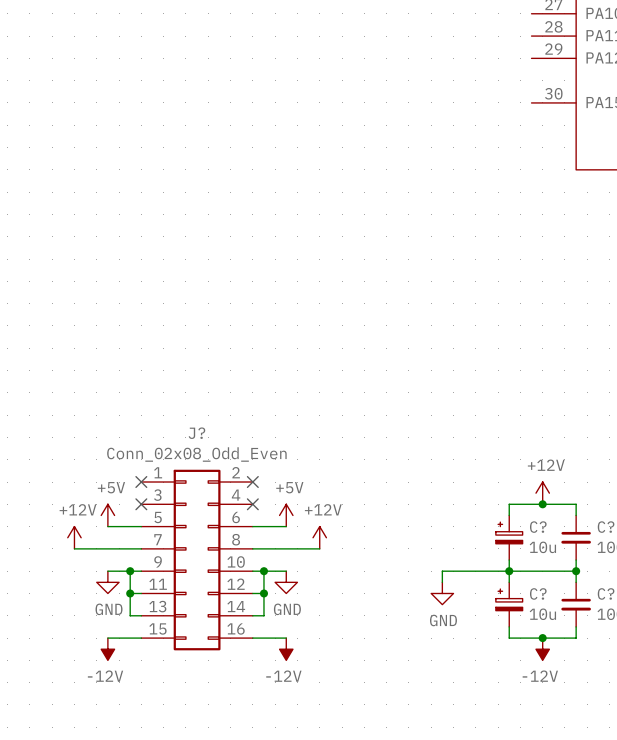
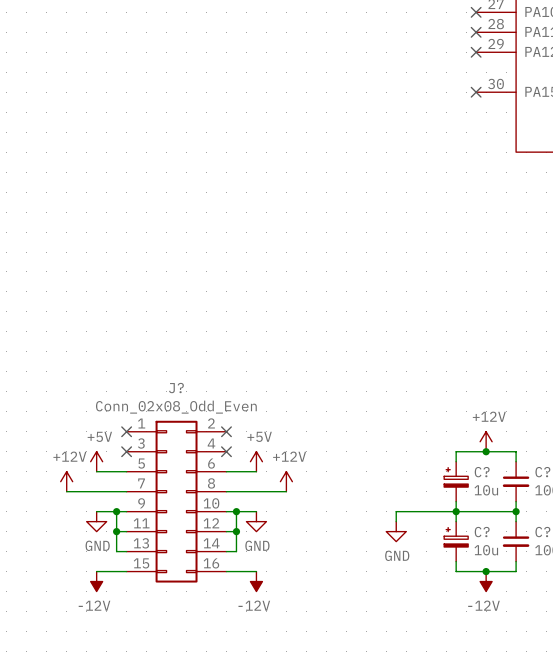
no-connect mark: none -> (476, 12)
no-connect mark: none -> (476, 32)
no-connect mark: none -> (476, 52)
no-connect mark: none -> (476, 92)

